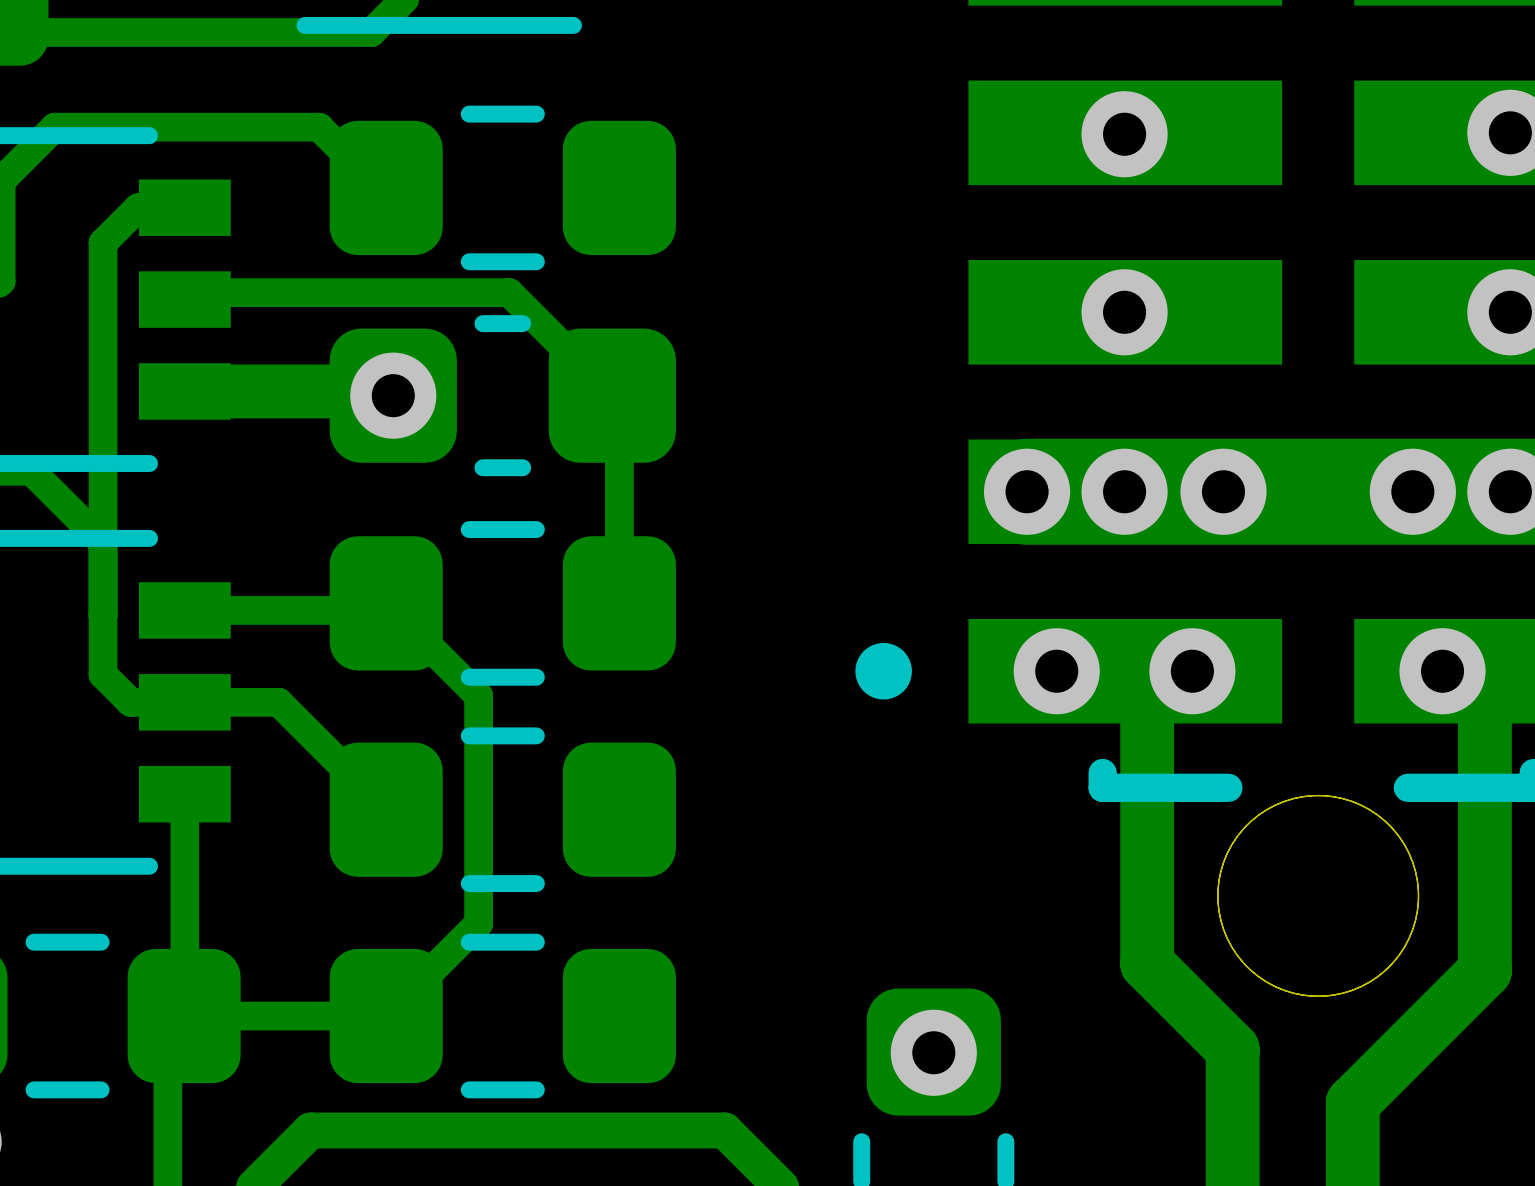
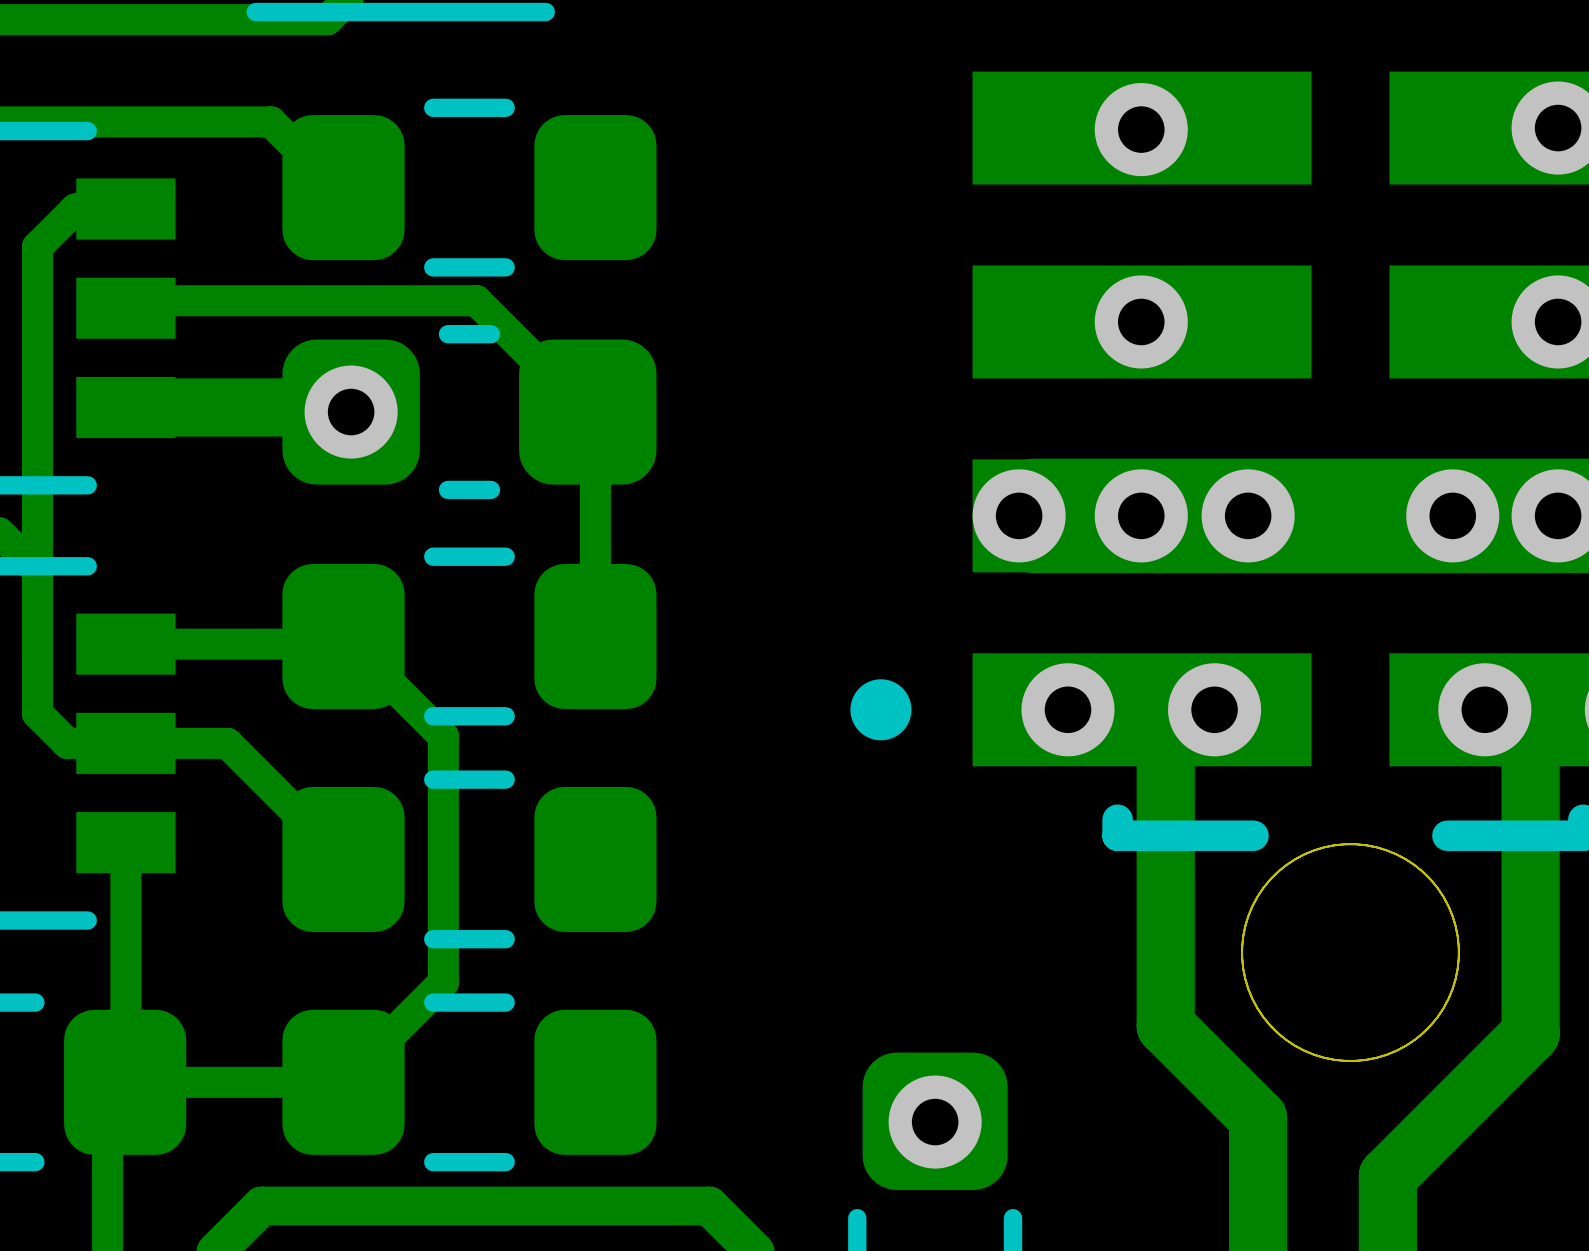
via position: (1027, 491) -> (1019, 515)

